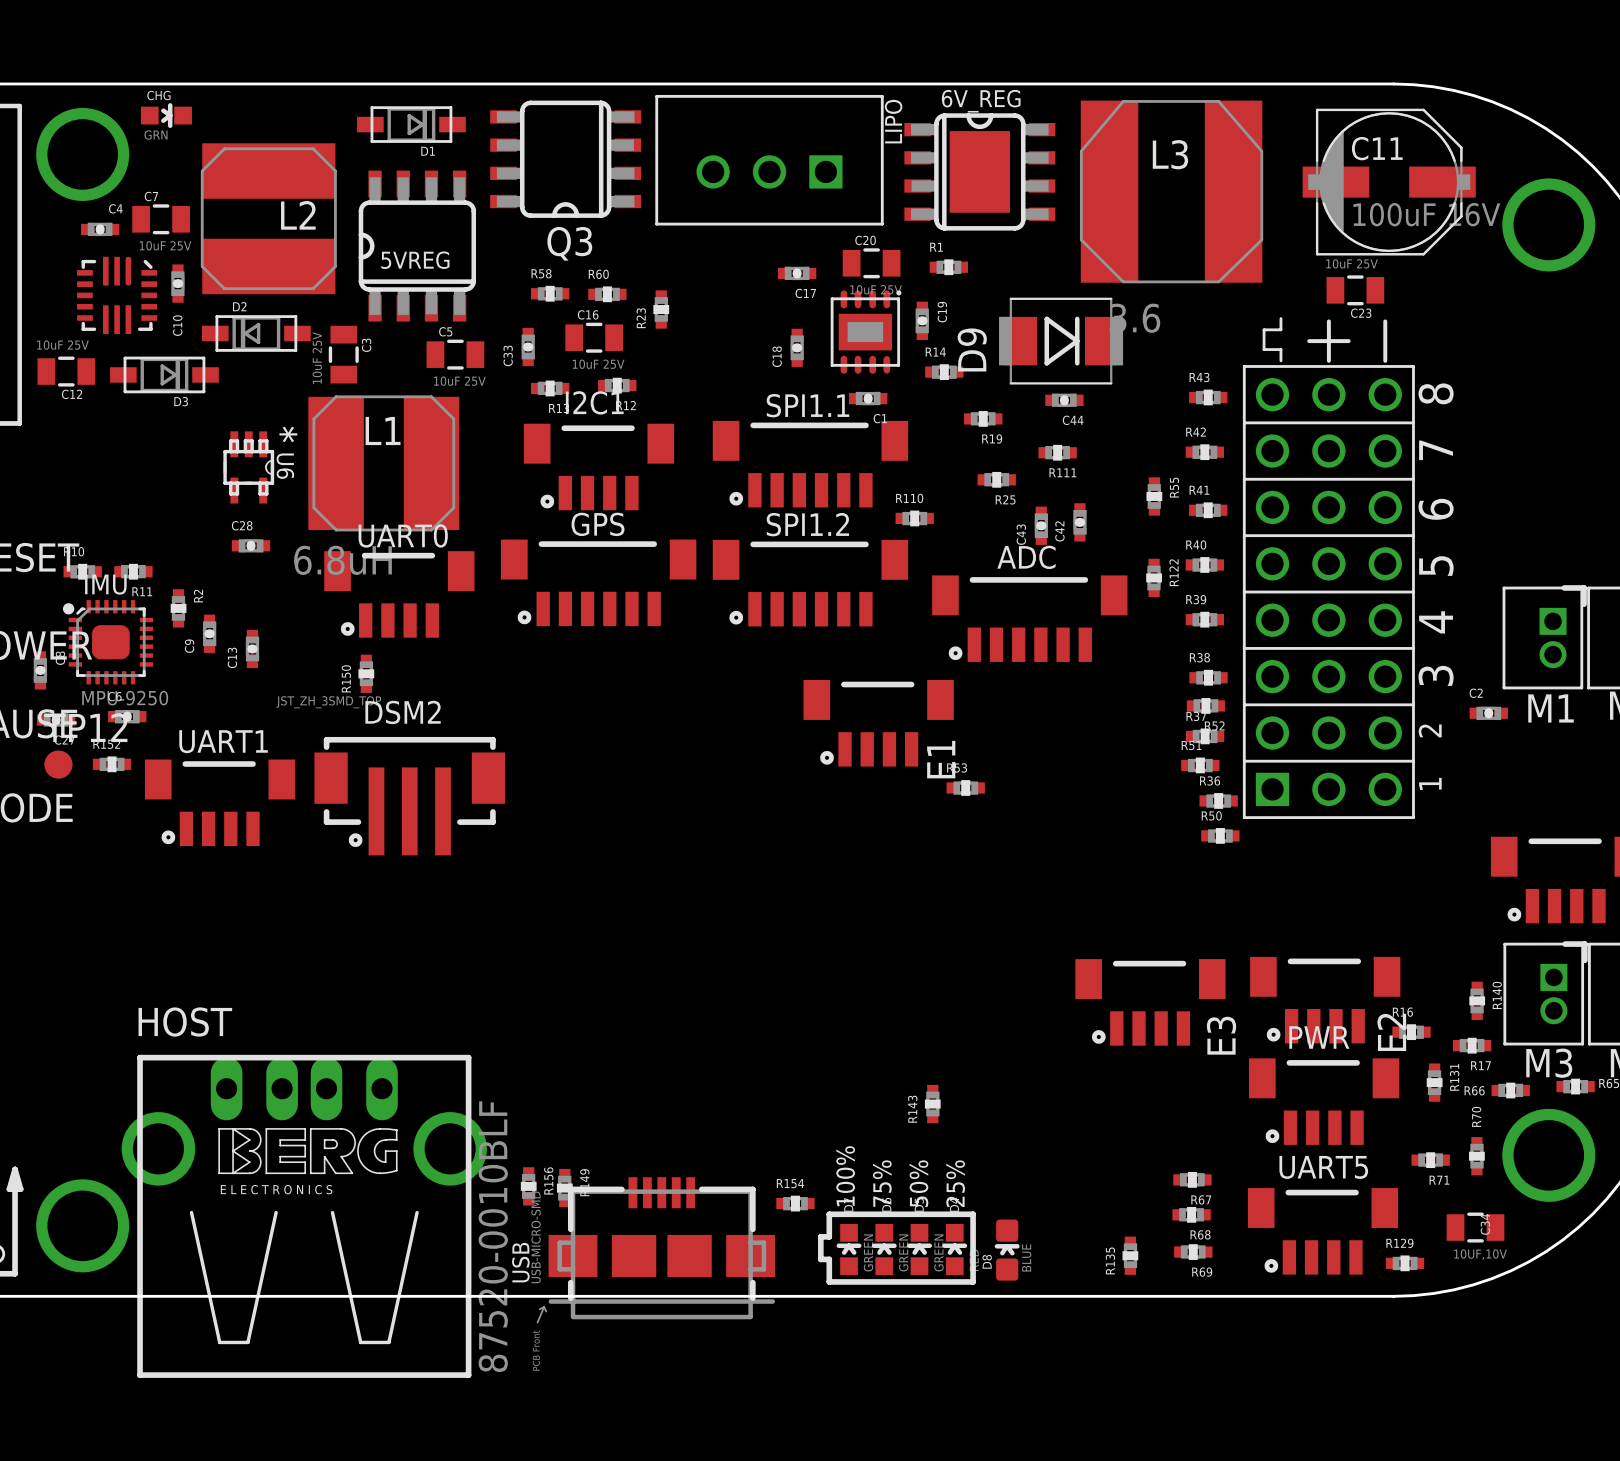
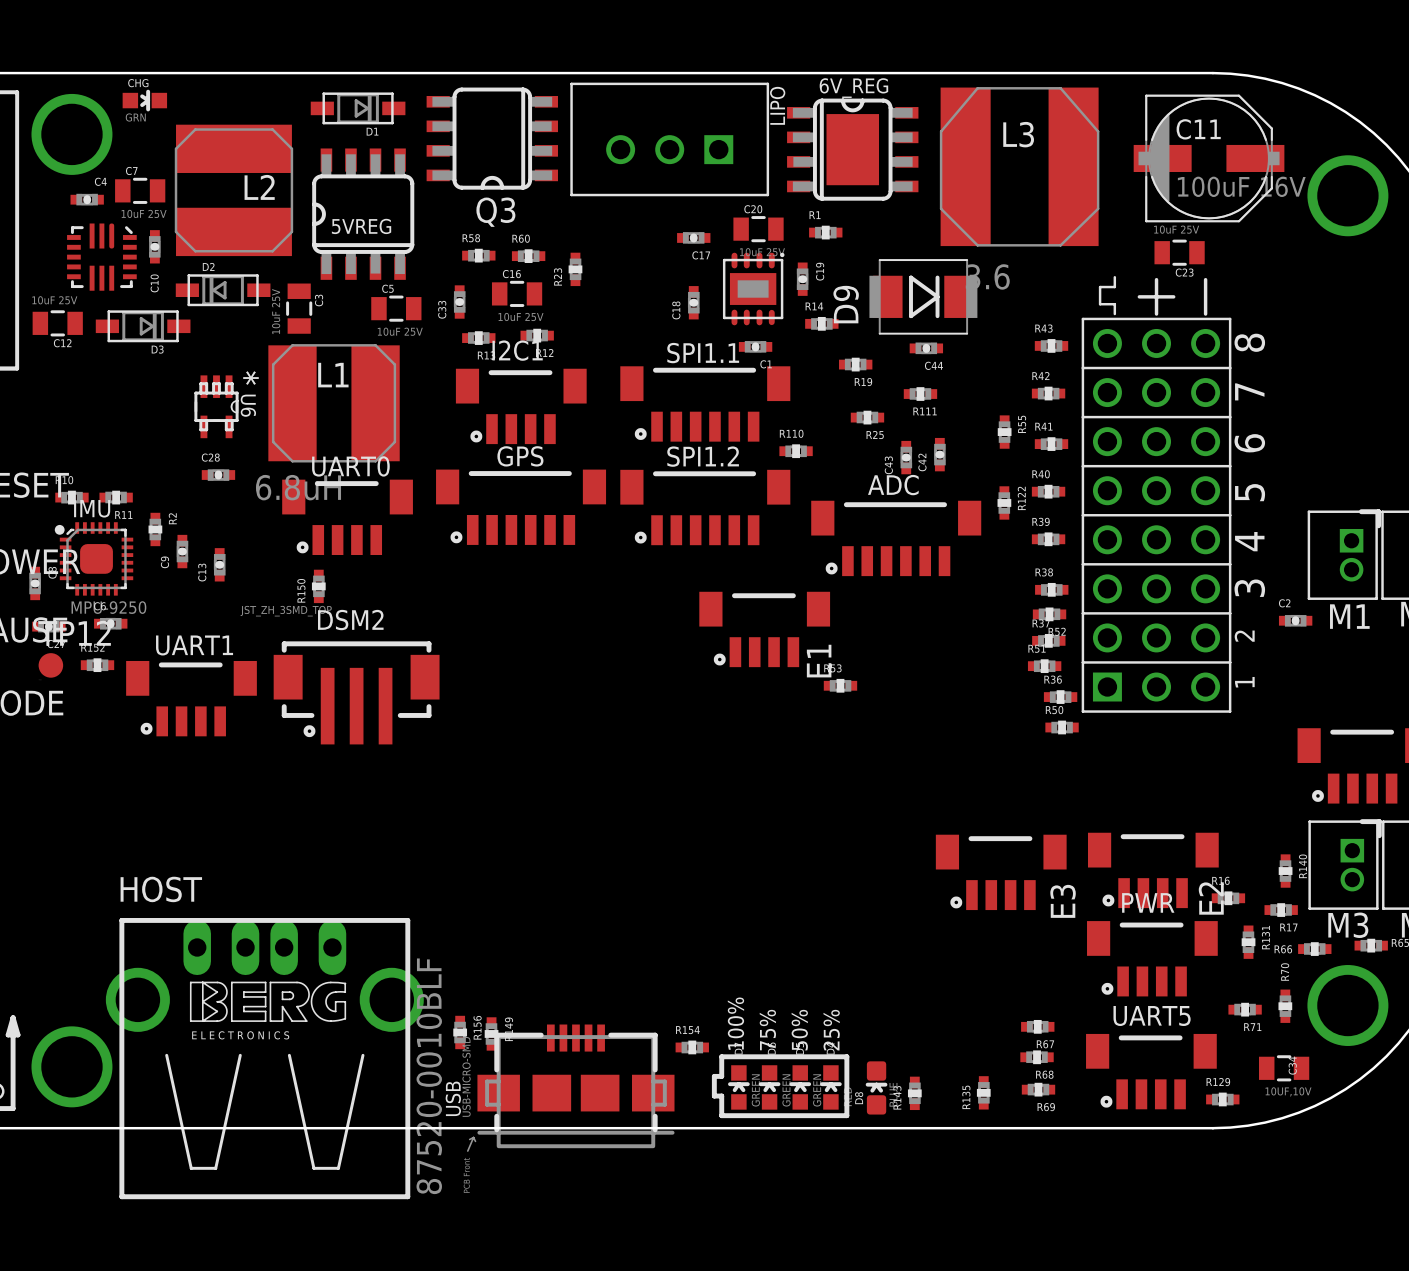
R143 position: (932, 1104) -> (914, 1093)

